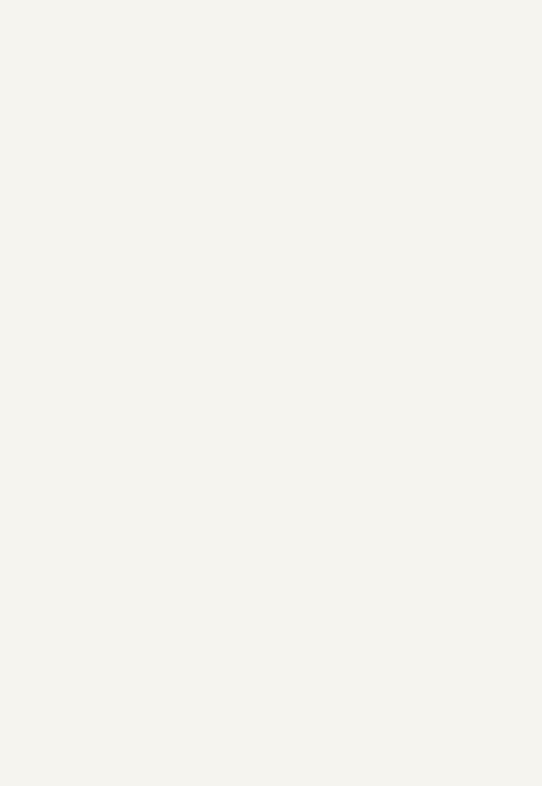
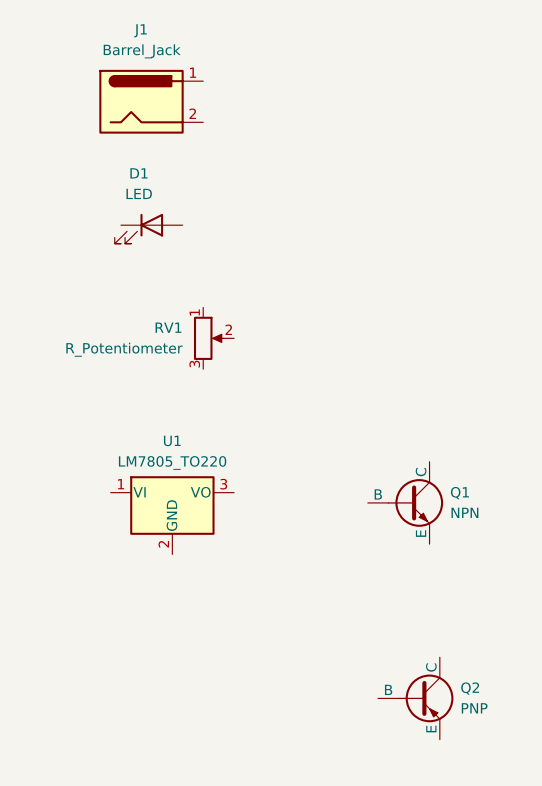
J1: none -> Barrel_Jack (151, 101)
D1: none -> LED (148, 228)
RV1: none -> R_Potentiometer (214, 338)
Q1: none -> NPN (405, 502)
U1: none -> LM7805_TO220 (172, 515)
Q2: none -> PNP (415, 698)

